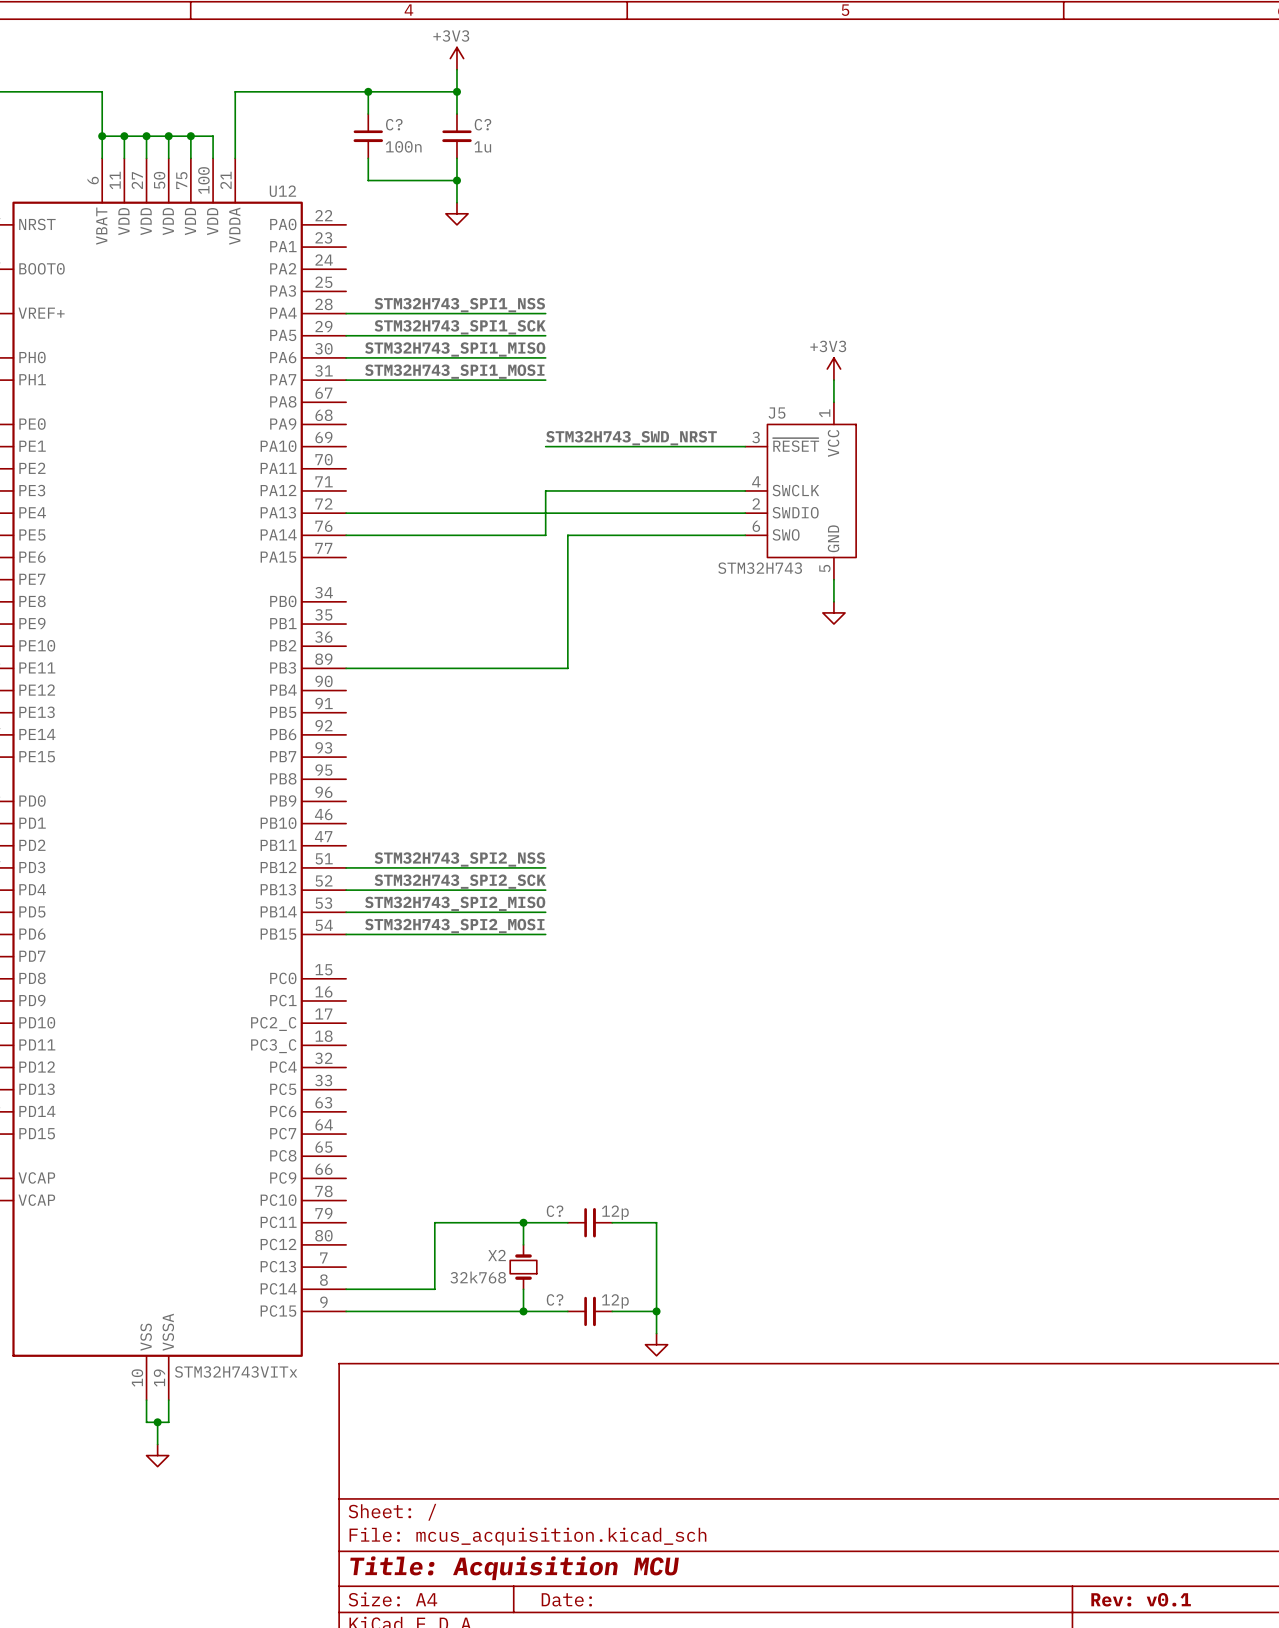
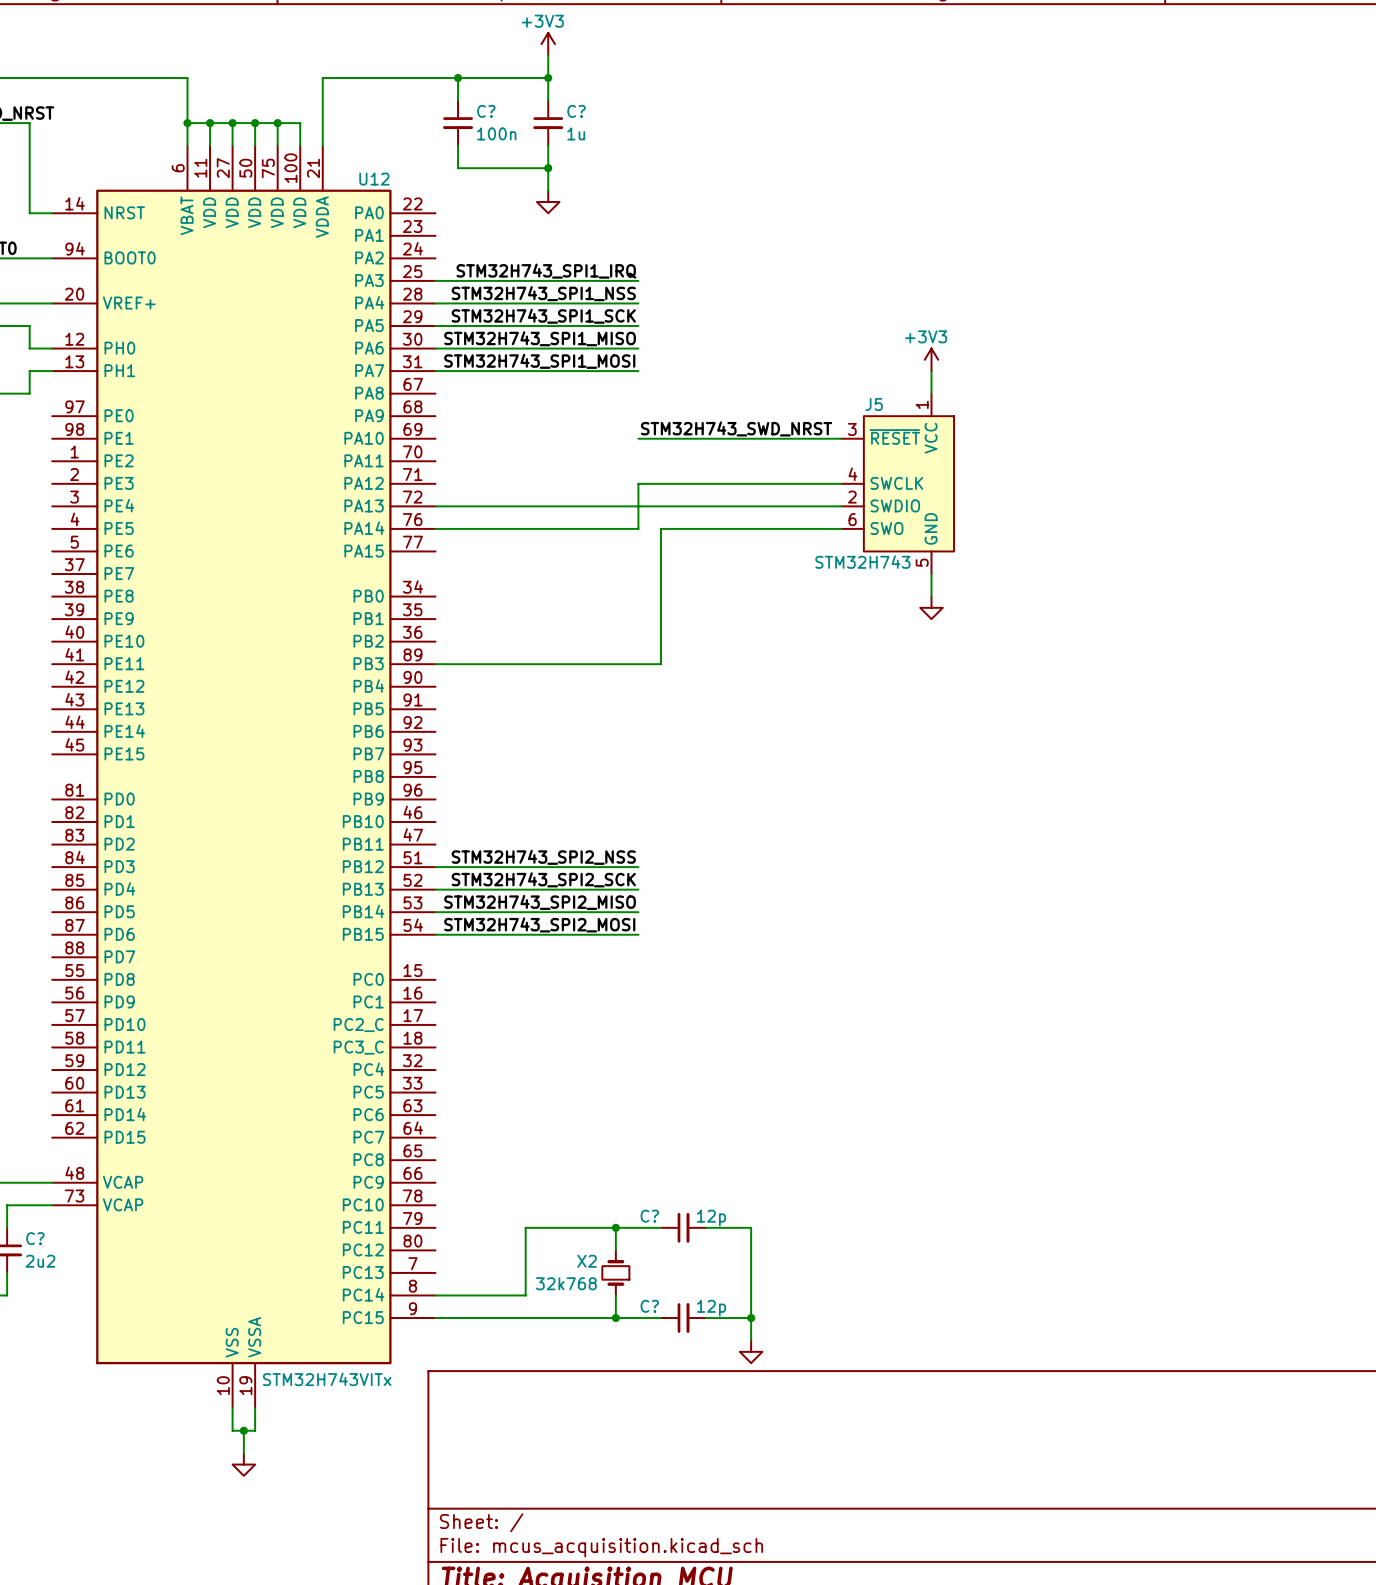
label: none -> STM32H743_SPI1_IRQ (546, 271)
wire: none -> (435, 280) (638, 280)

